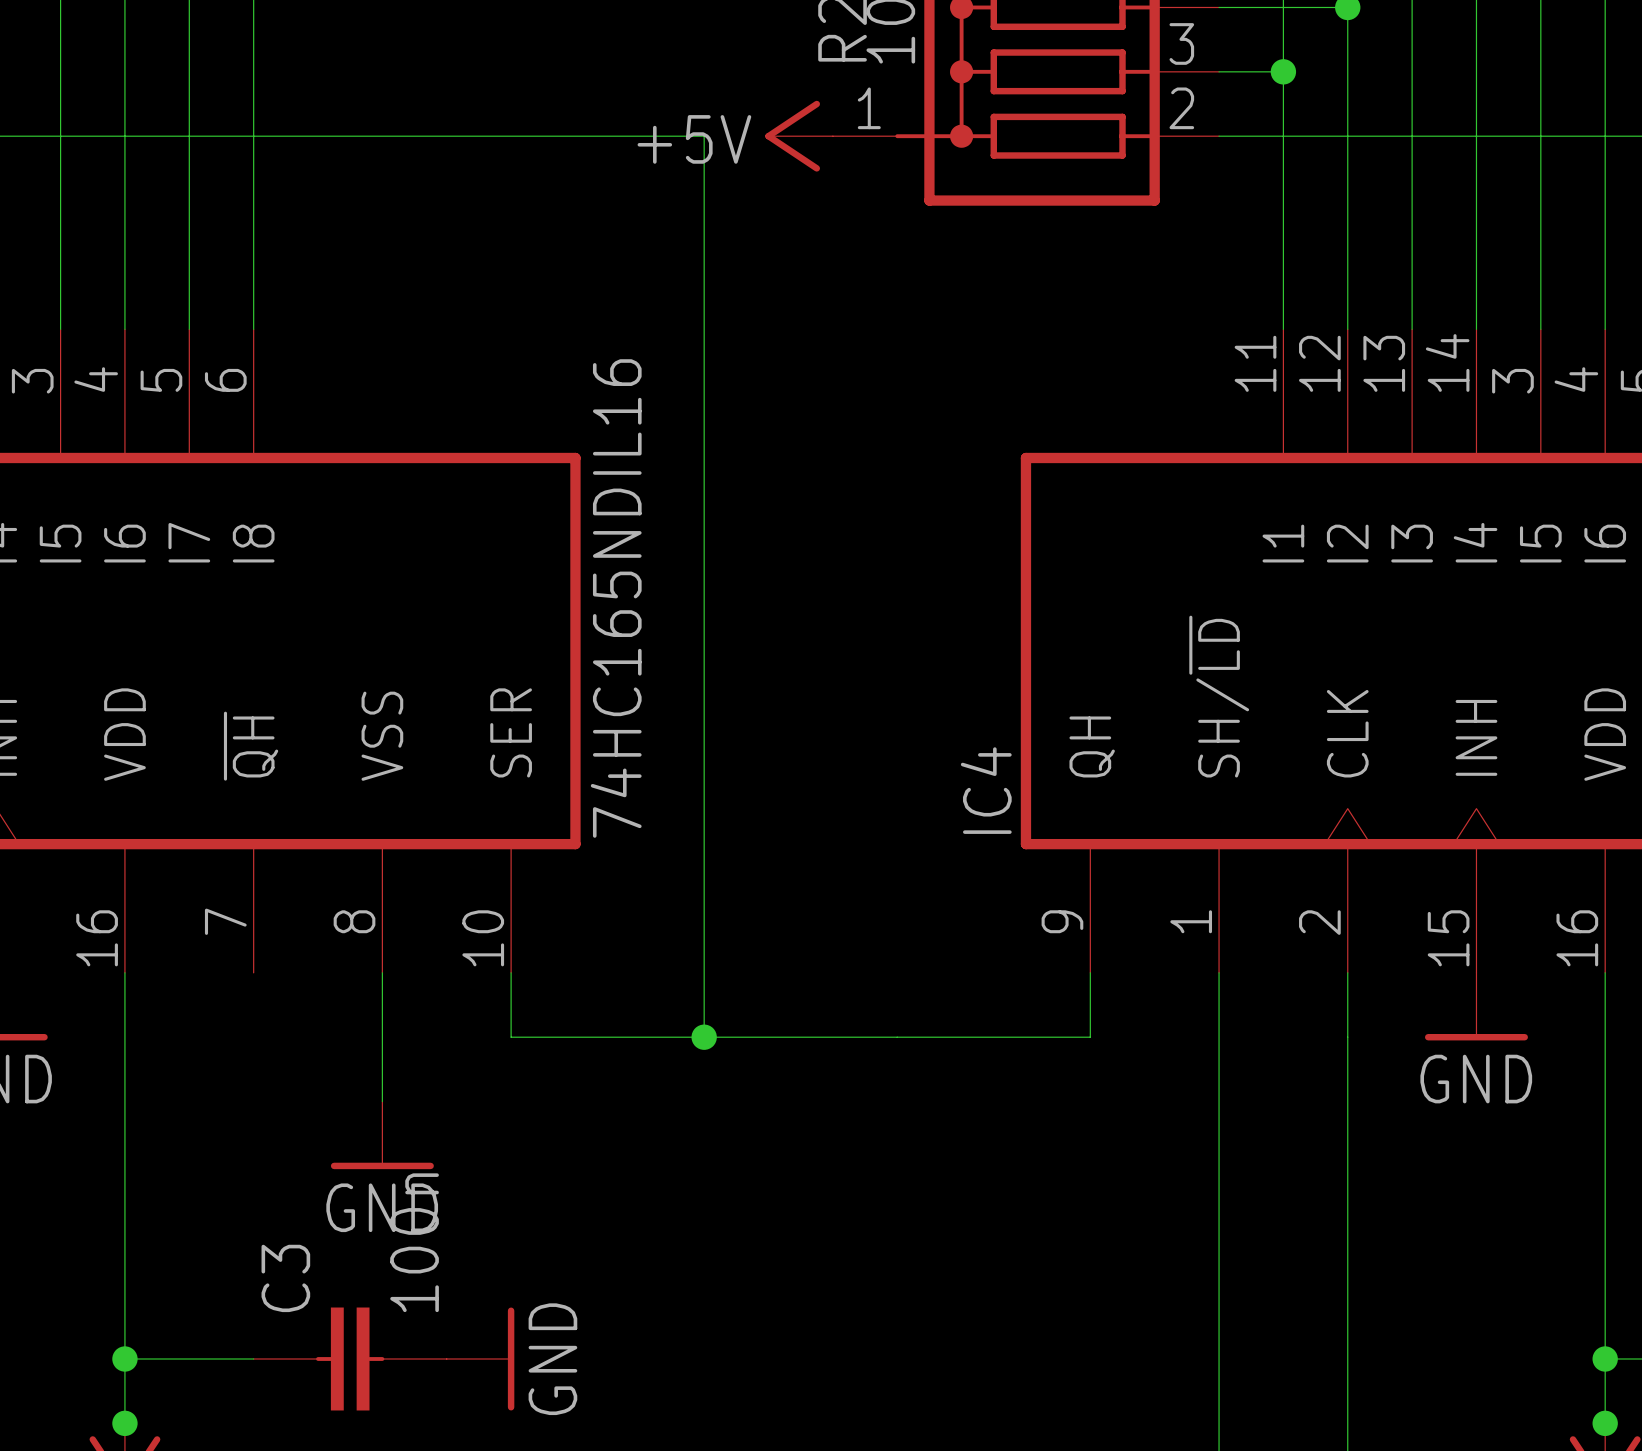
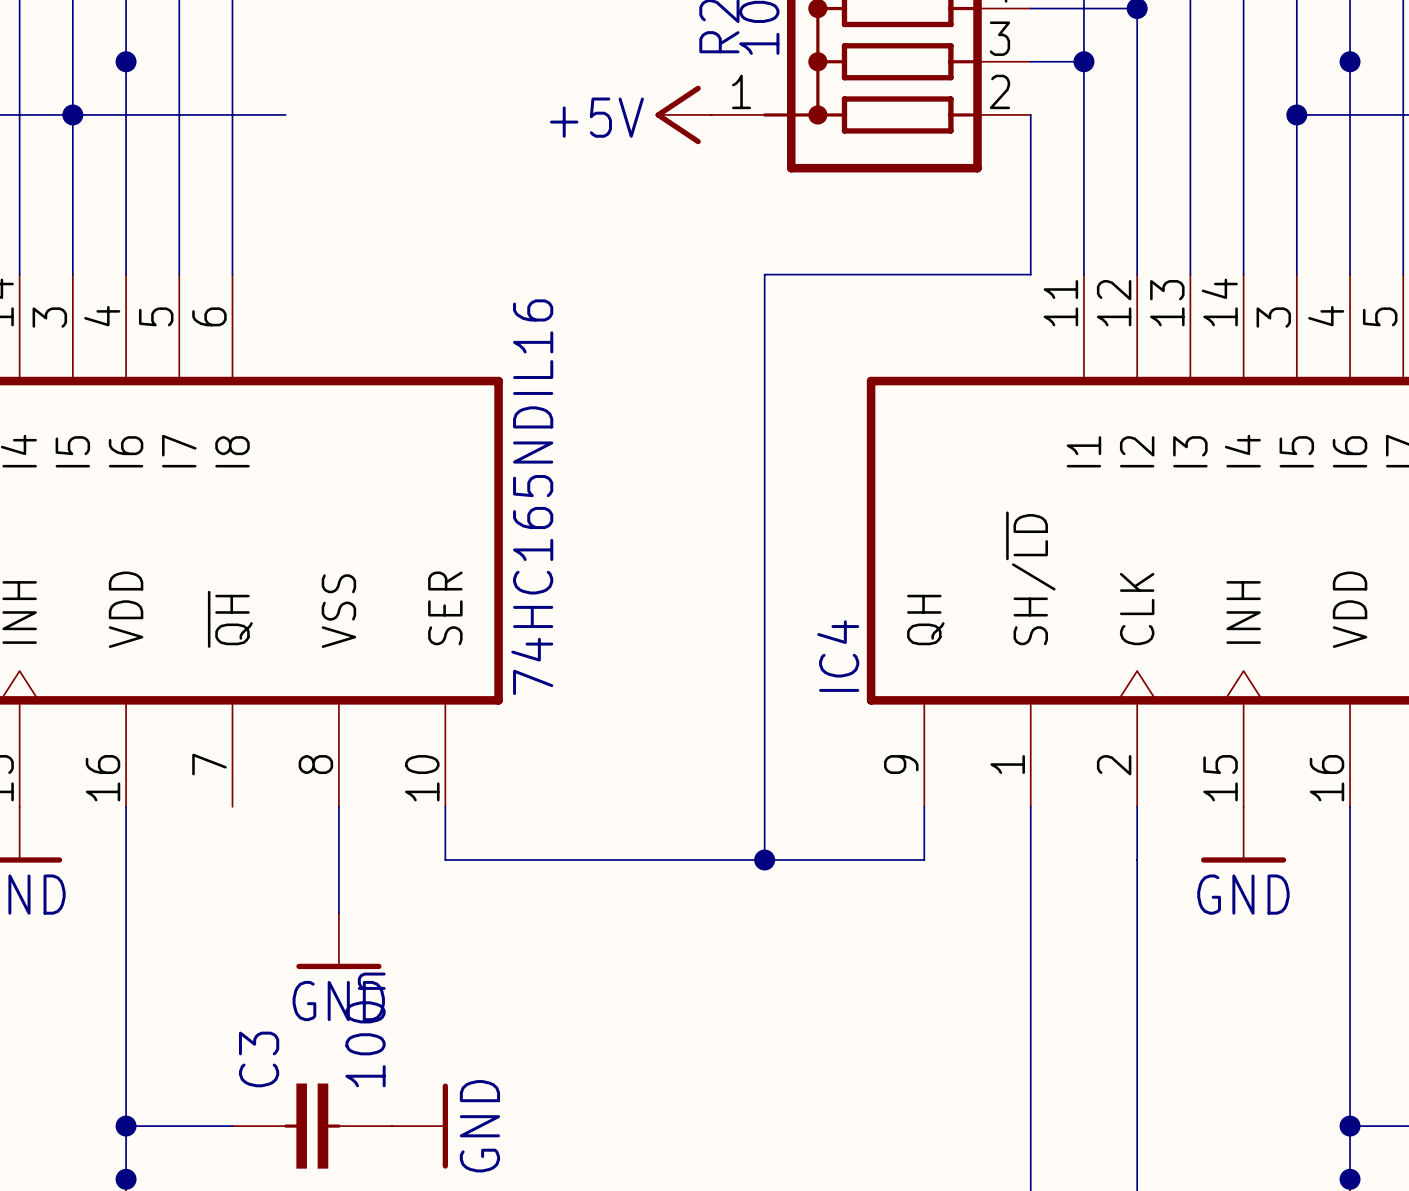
junction: none -> (126, 61)
junction: none -> (1350, 61)
junction: none -> (72, 114)
wire: (318, 136) (704, 136) (704, 1037) -> none
wire: (1219, 136) (1540, 136) -> (1030, 114) (1030, 274) (764, 274) (764, 860)
junction: none -> (1296, 114)
junction: (704, 1037) -> none
junction: none -> (764, 860)

